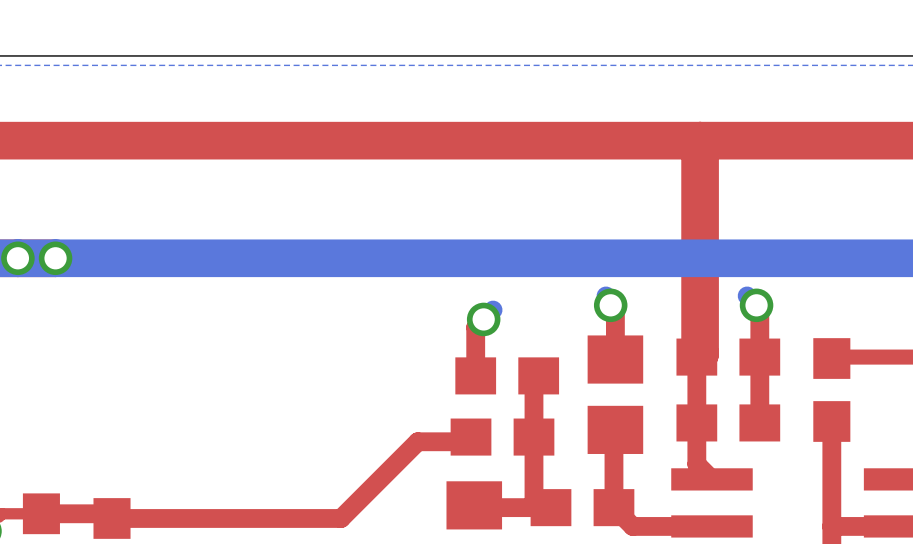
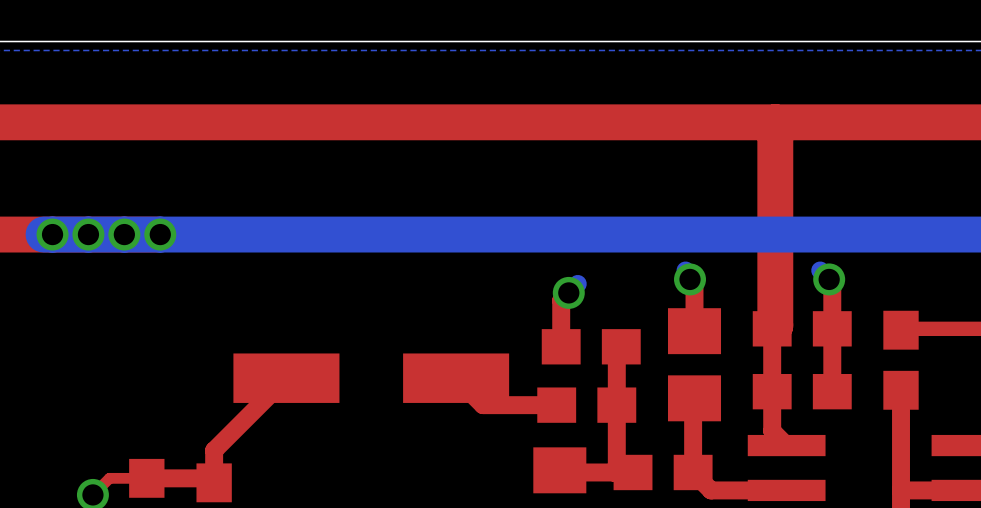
top track: none -> (286, 378) (214, 450) (214, 482)
part: none -> (371, 378)
top track: (471, 437) (466, 441) (417, 441) (341, 518) (112, 518) -> (556, 405) (483, 405) (456, 378)

